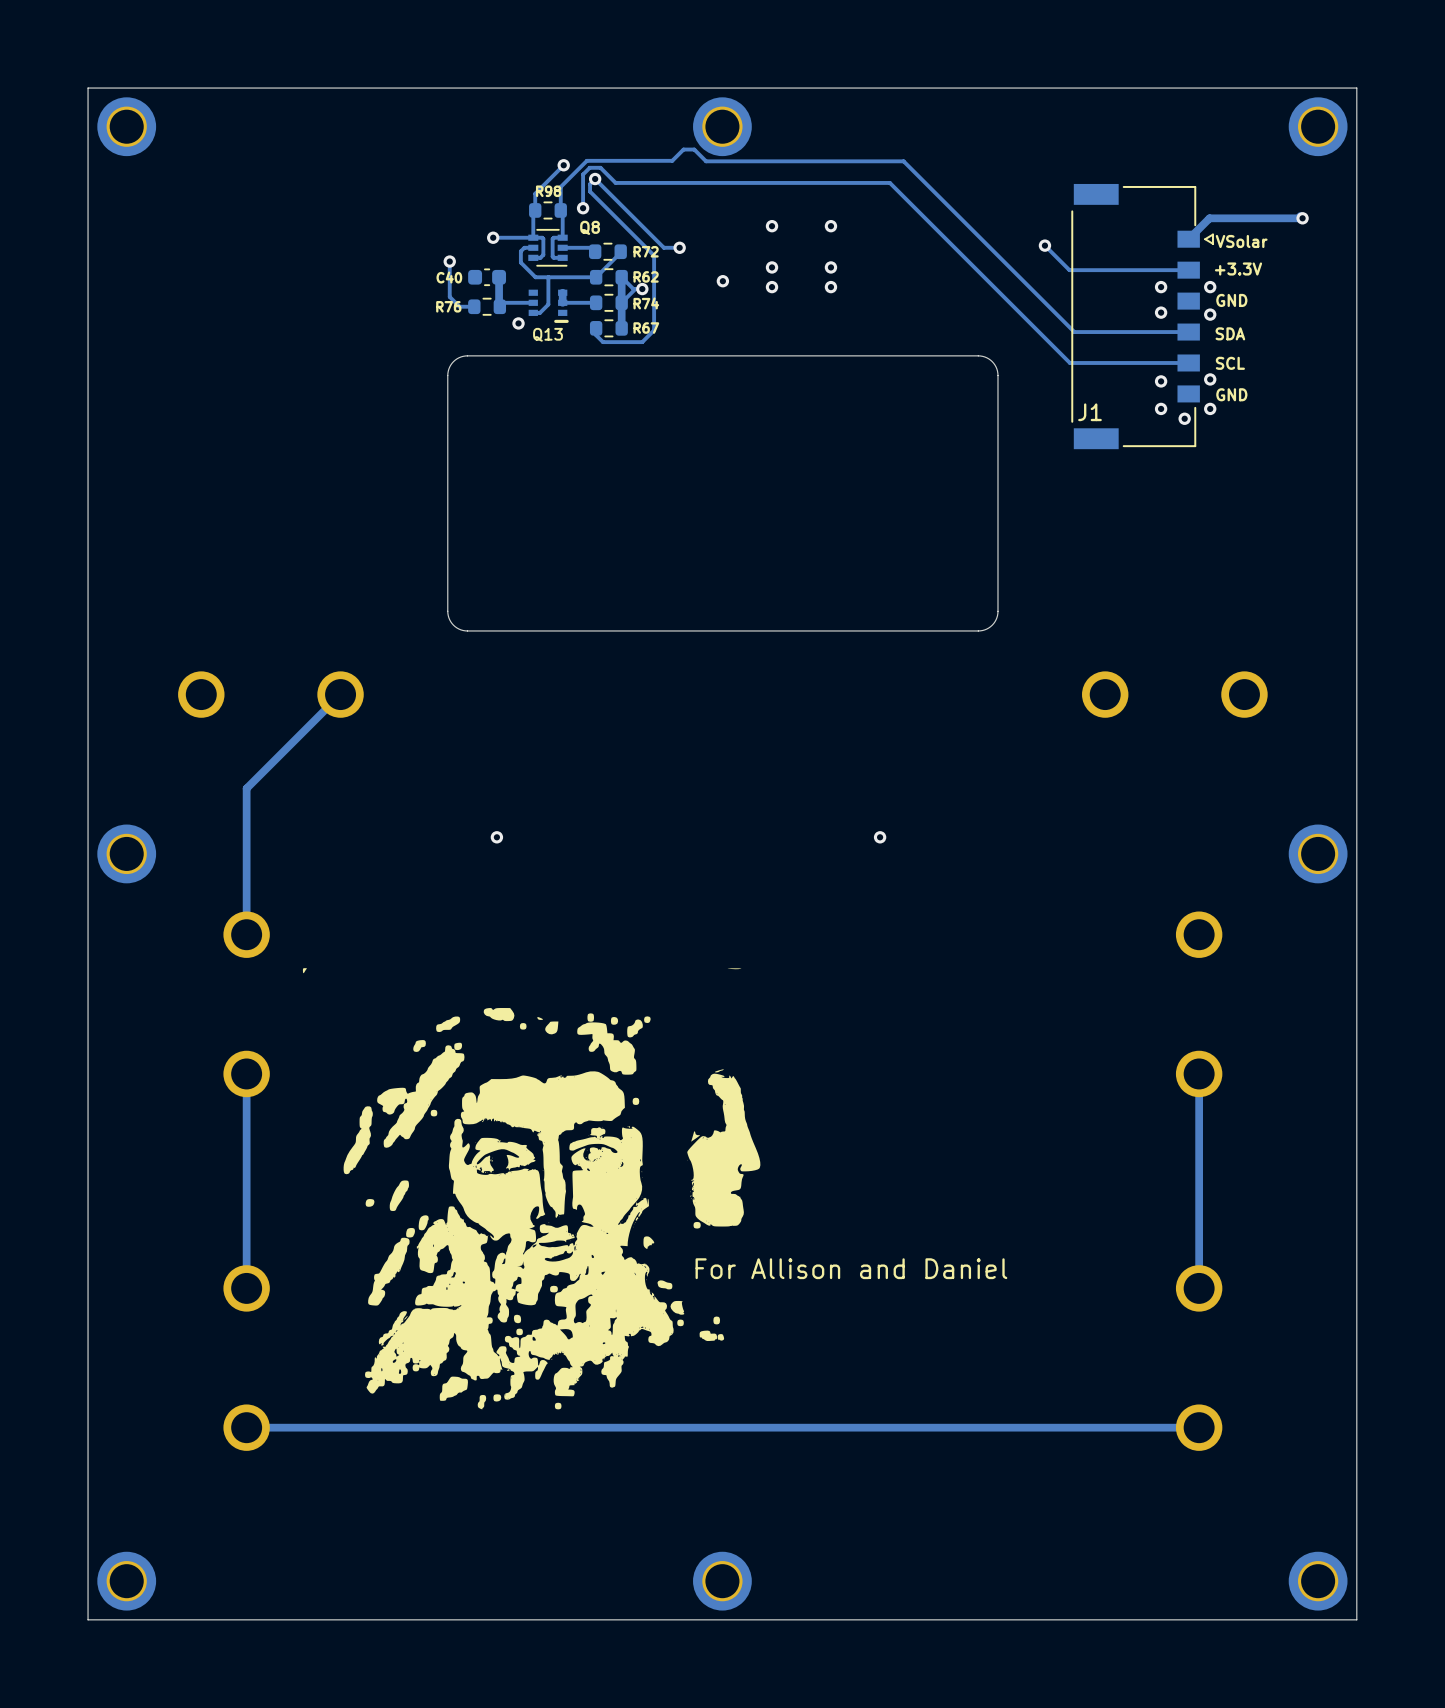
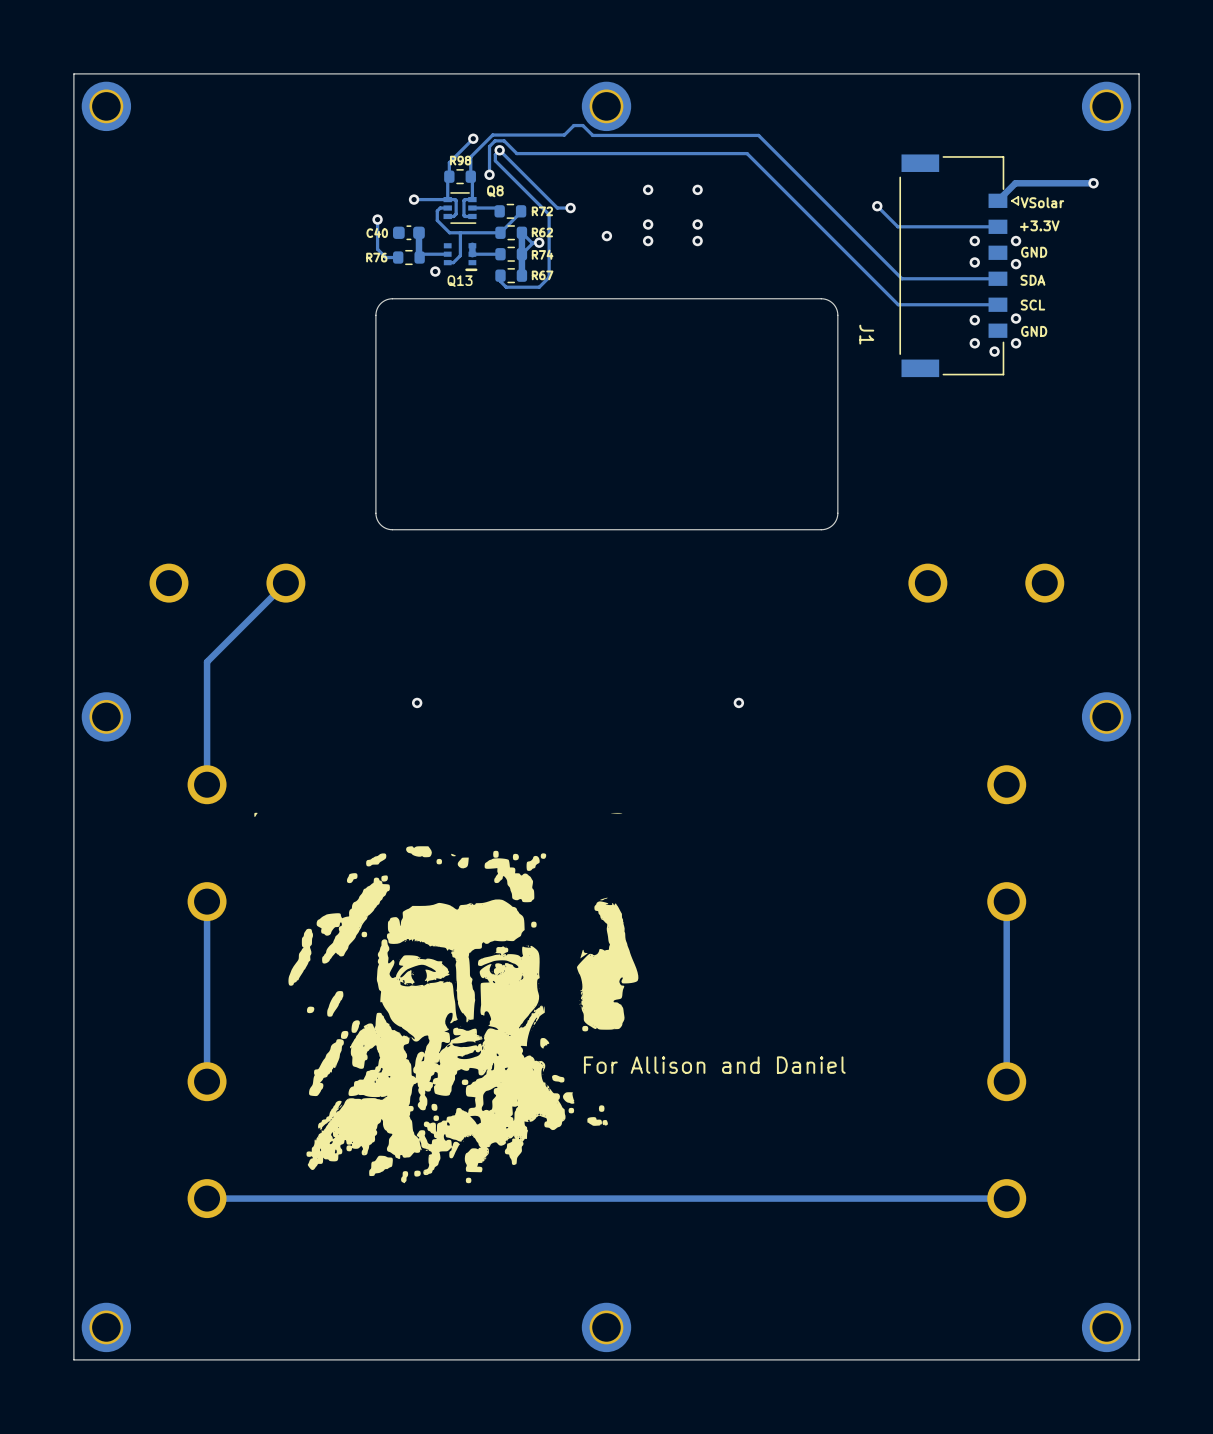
J1 name rotation: 0° (1089, 412) -> 90° clockwise (866, 334)
J1 name position: J1 (1089, 412) -> J1 (866, 334)

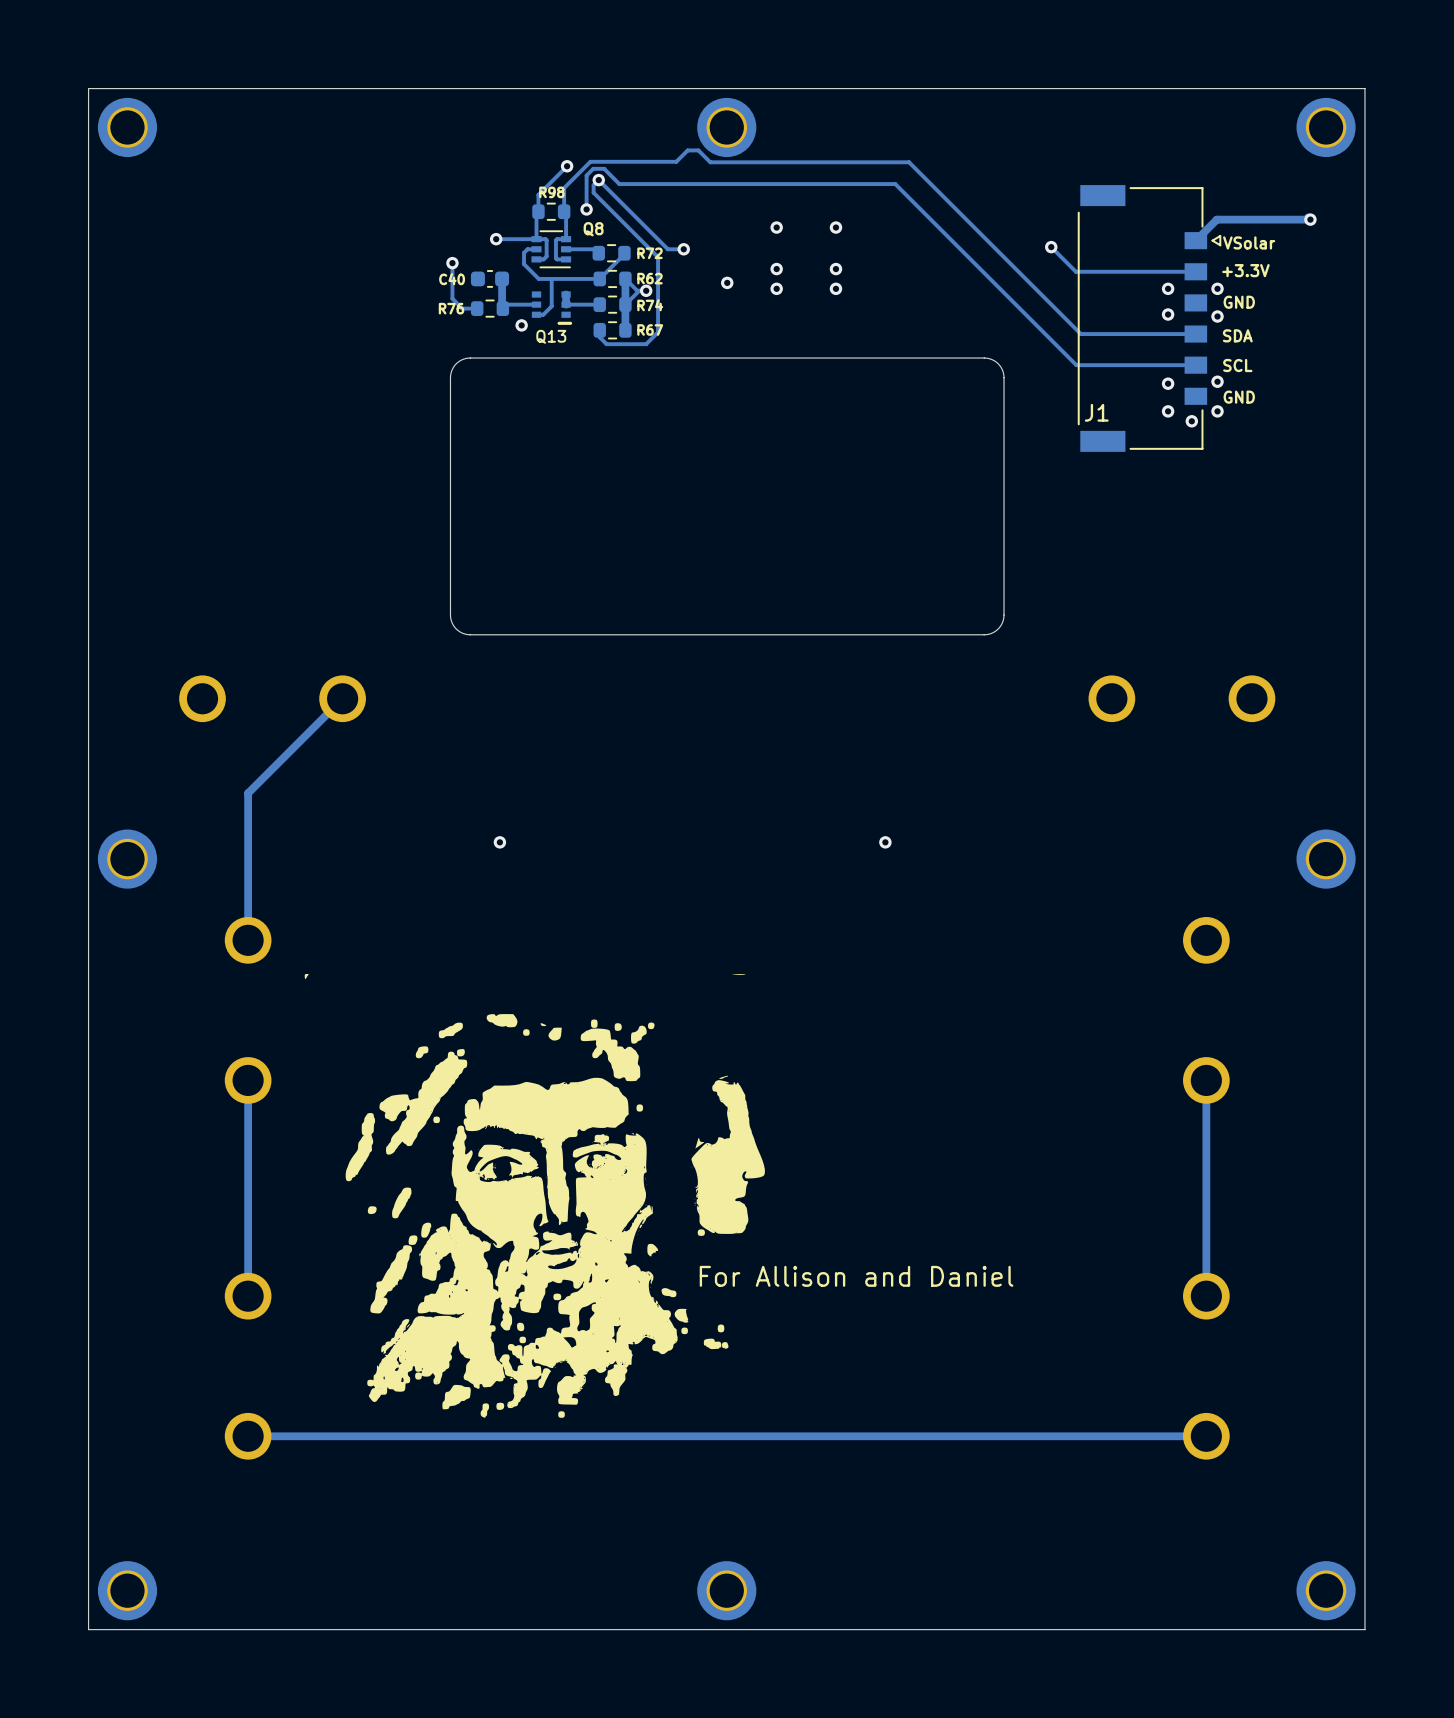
J1 name rotation: 0° (866, 334) -> 90° counterclockwise (1096, 412)
J1 name position: J1 (866, 334) -> J1 (1096, 412)

